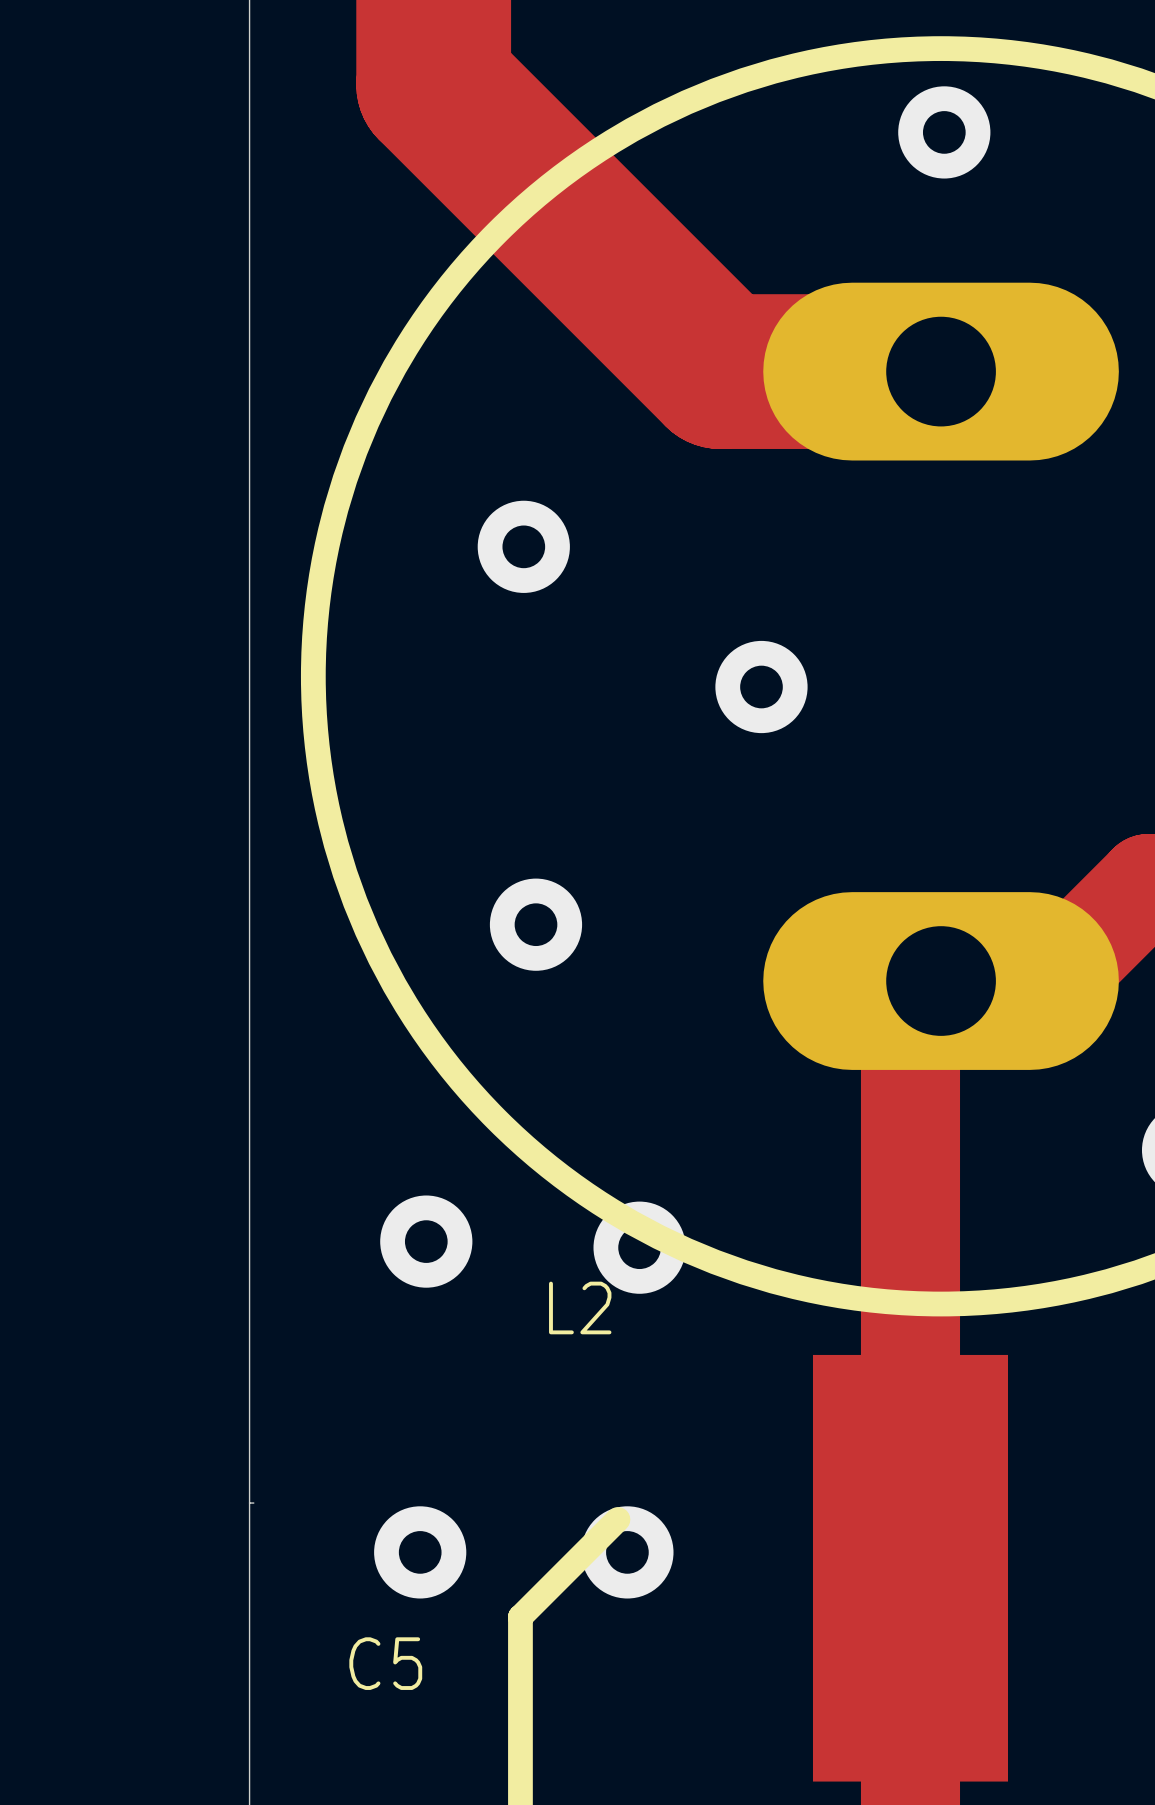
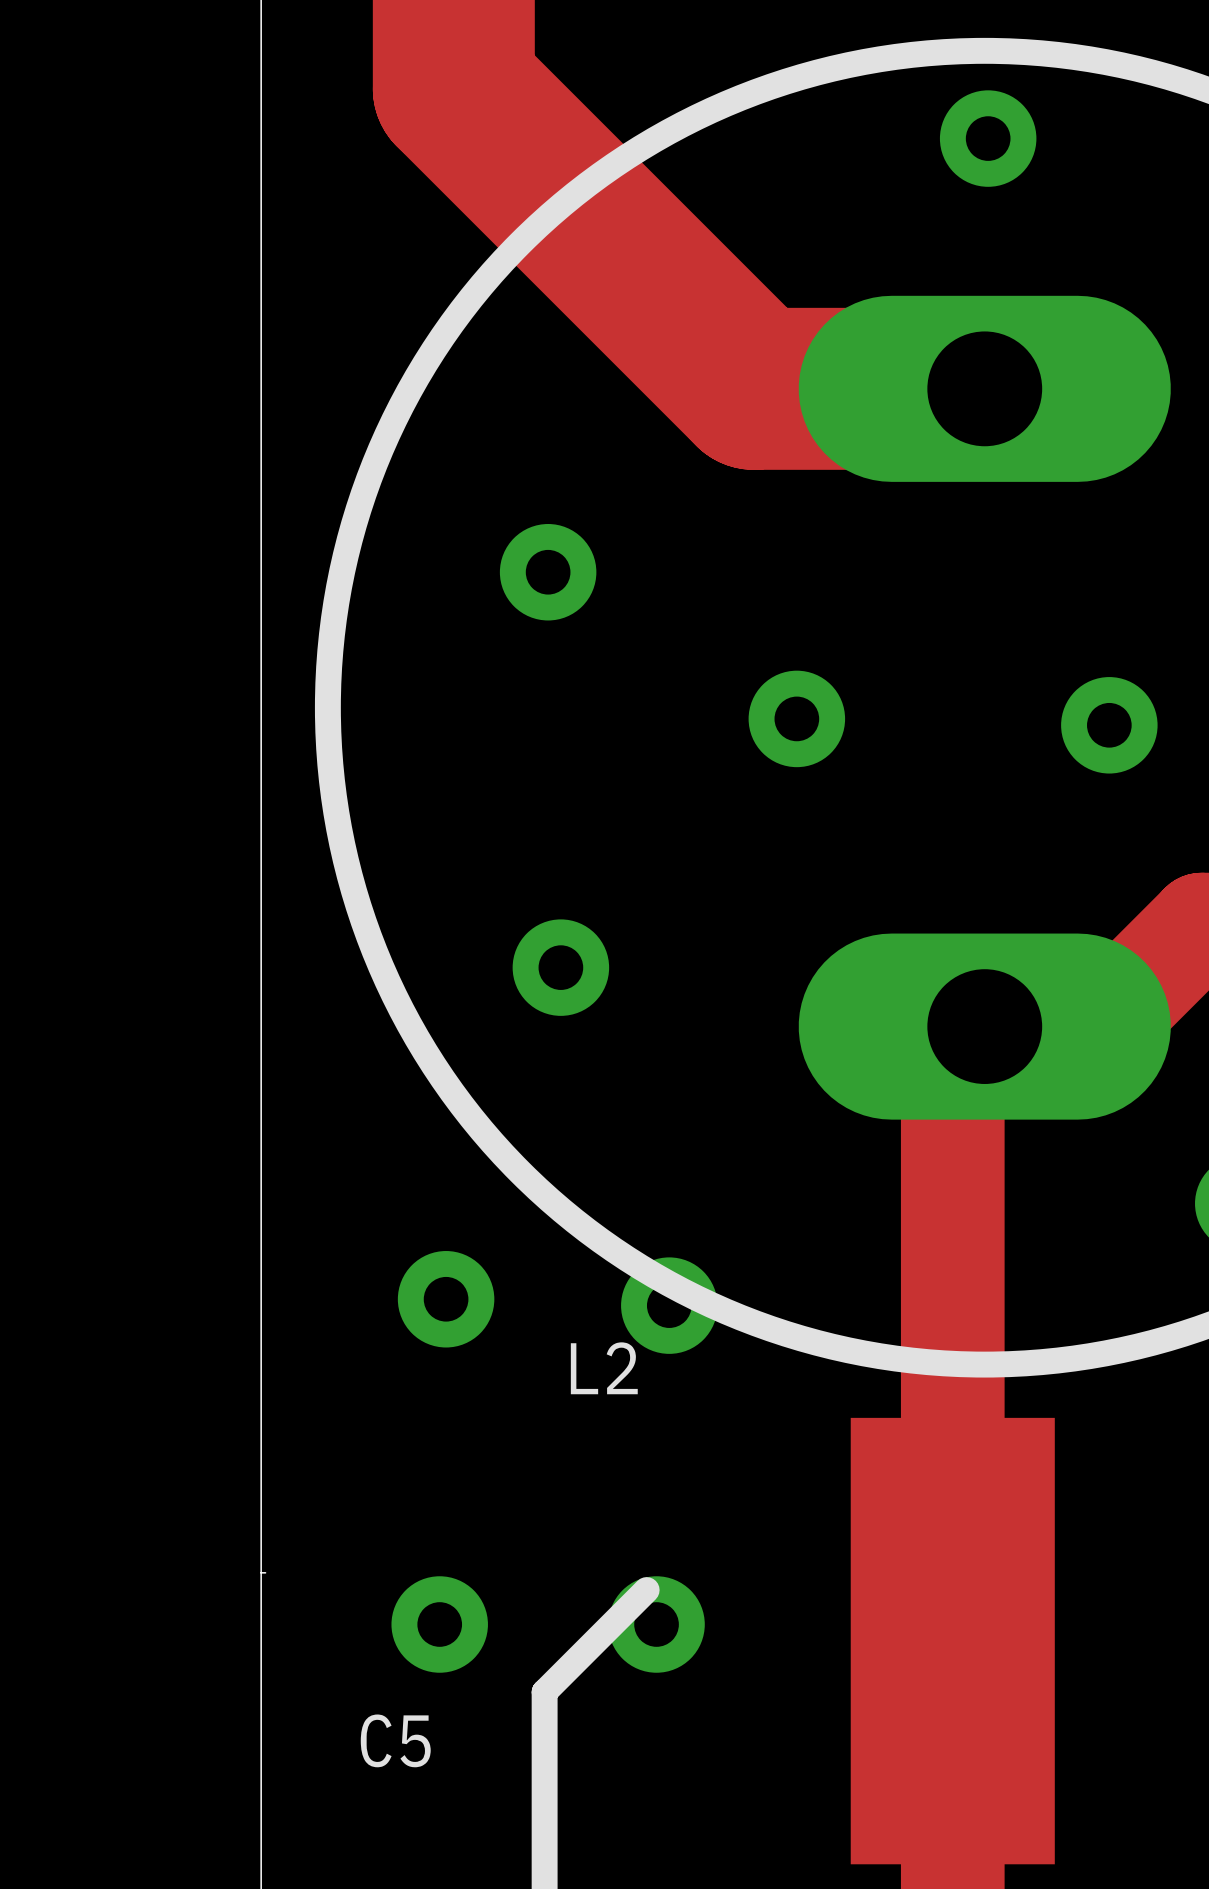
via: none -> (1109, 725)

